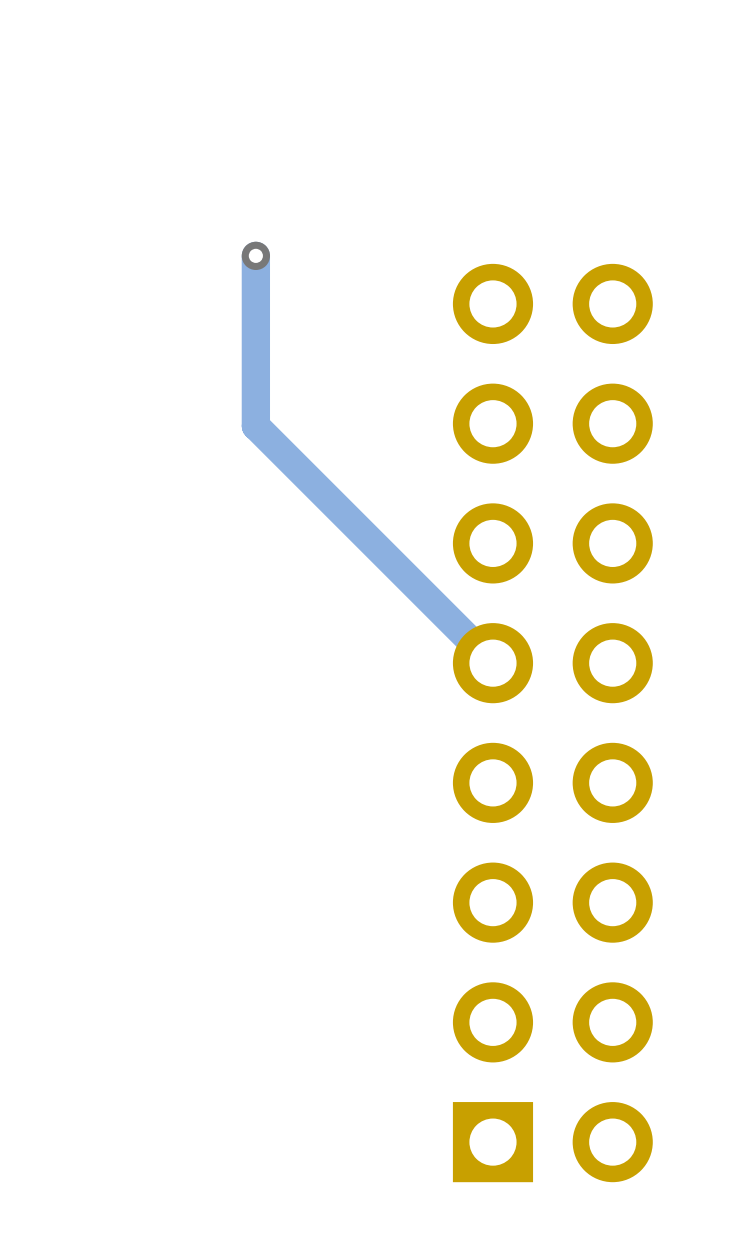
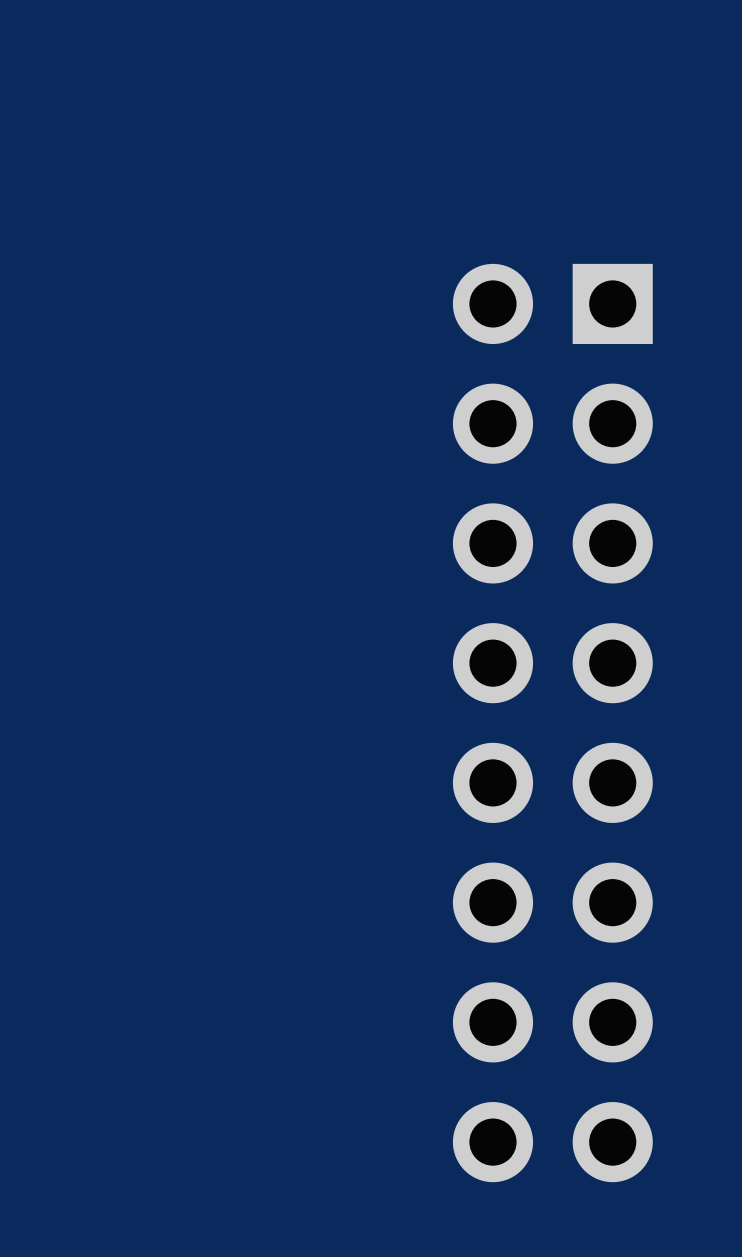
track: (255, 255) (255, 426) (492, 663) -> none
via: (255, 255) -> none
part rotation: 0° (552, 723) -> 180° (552, 723)

